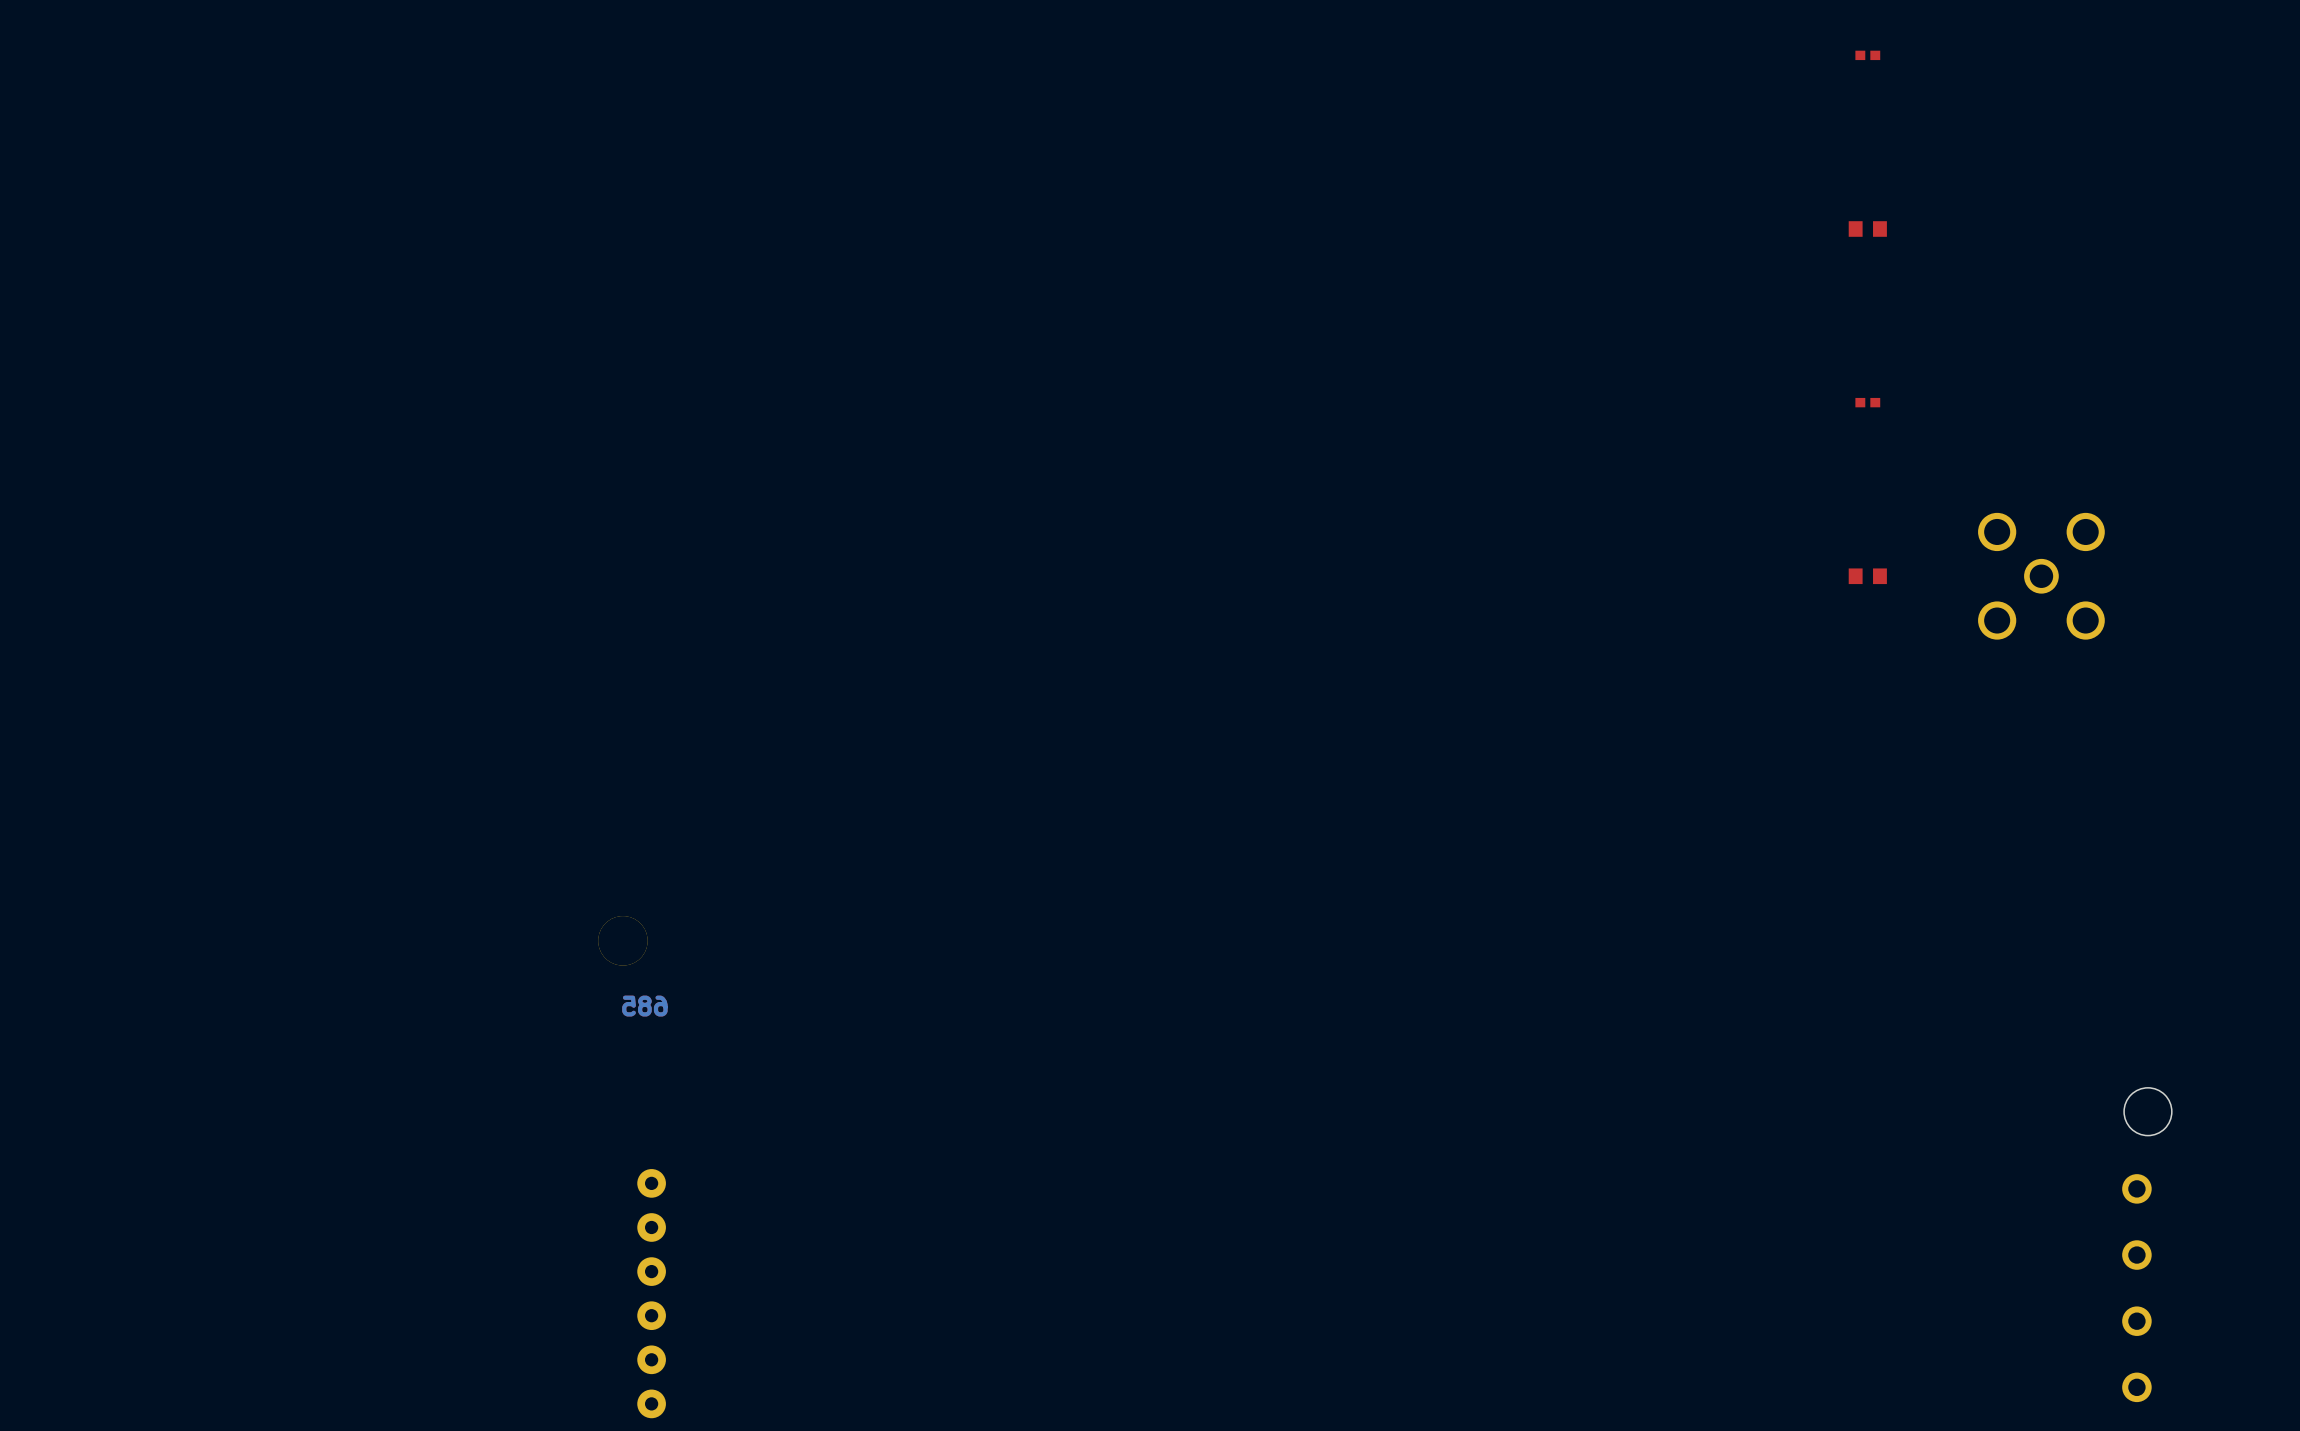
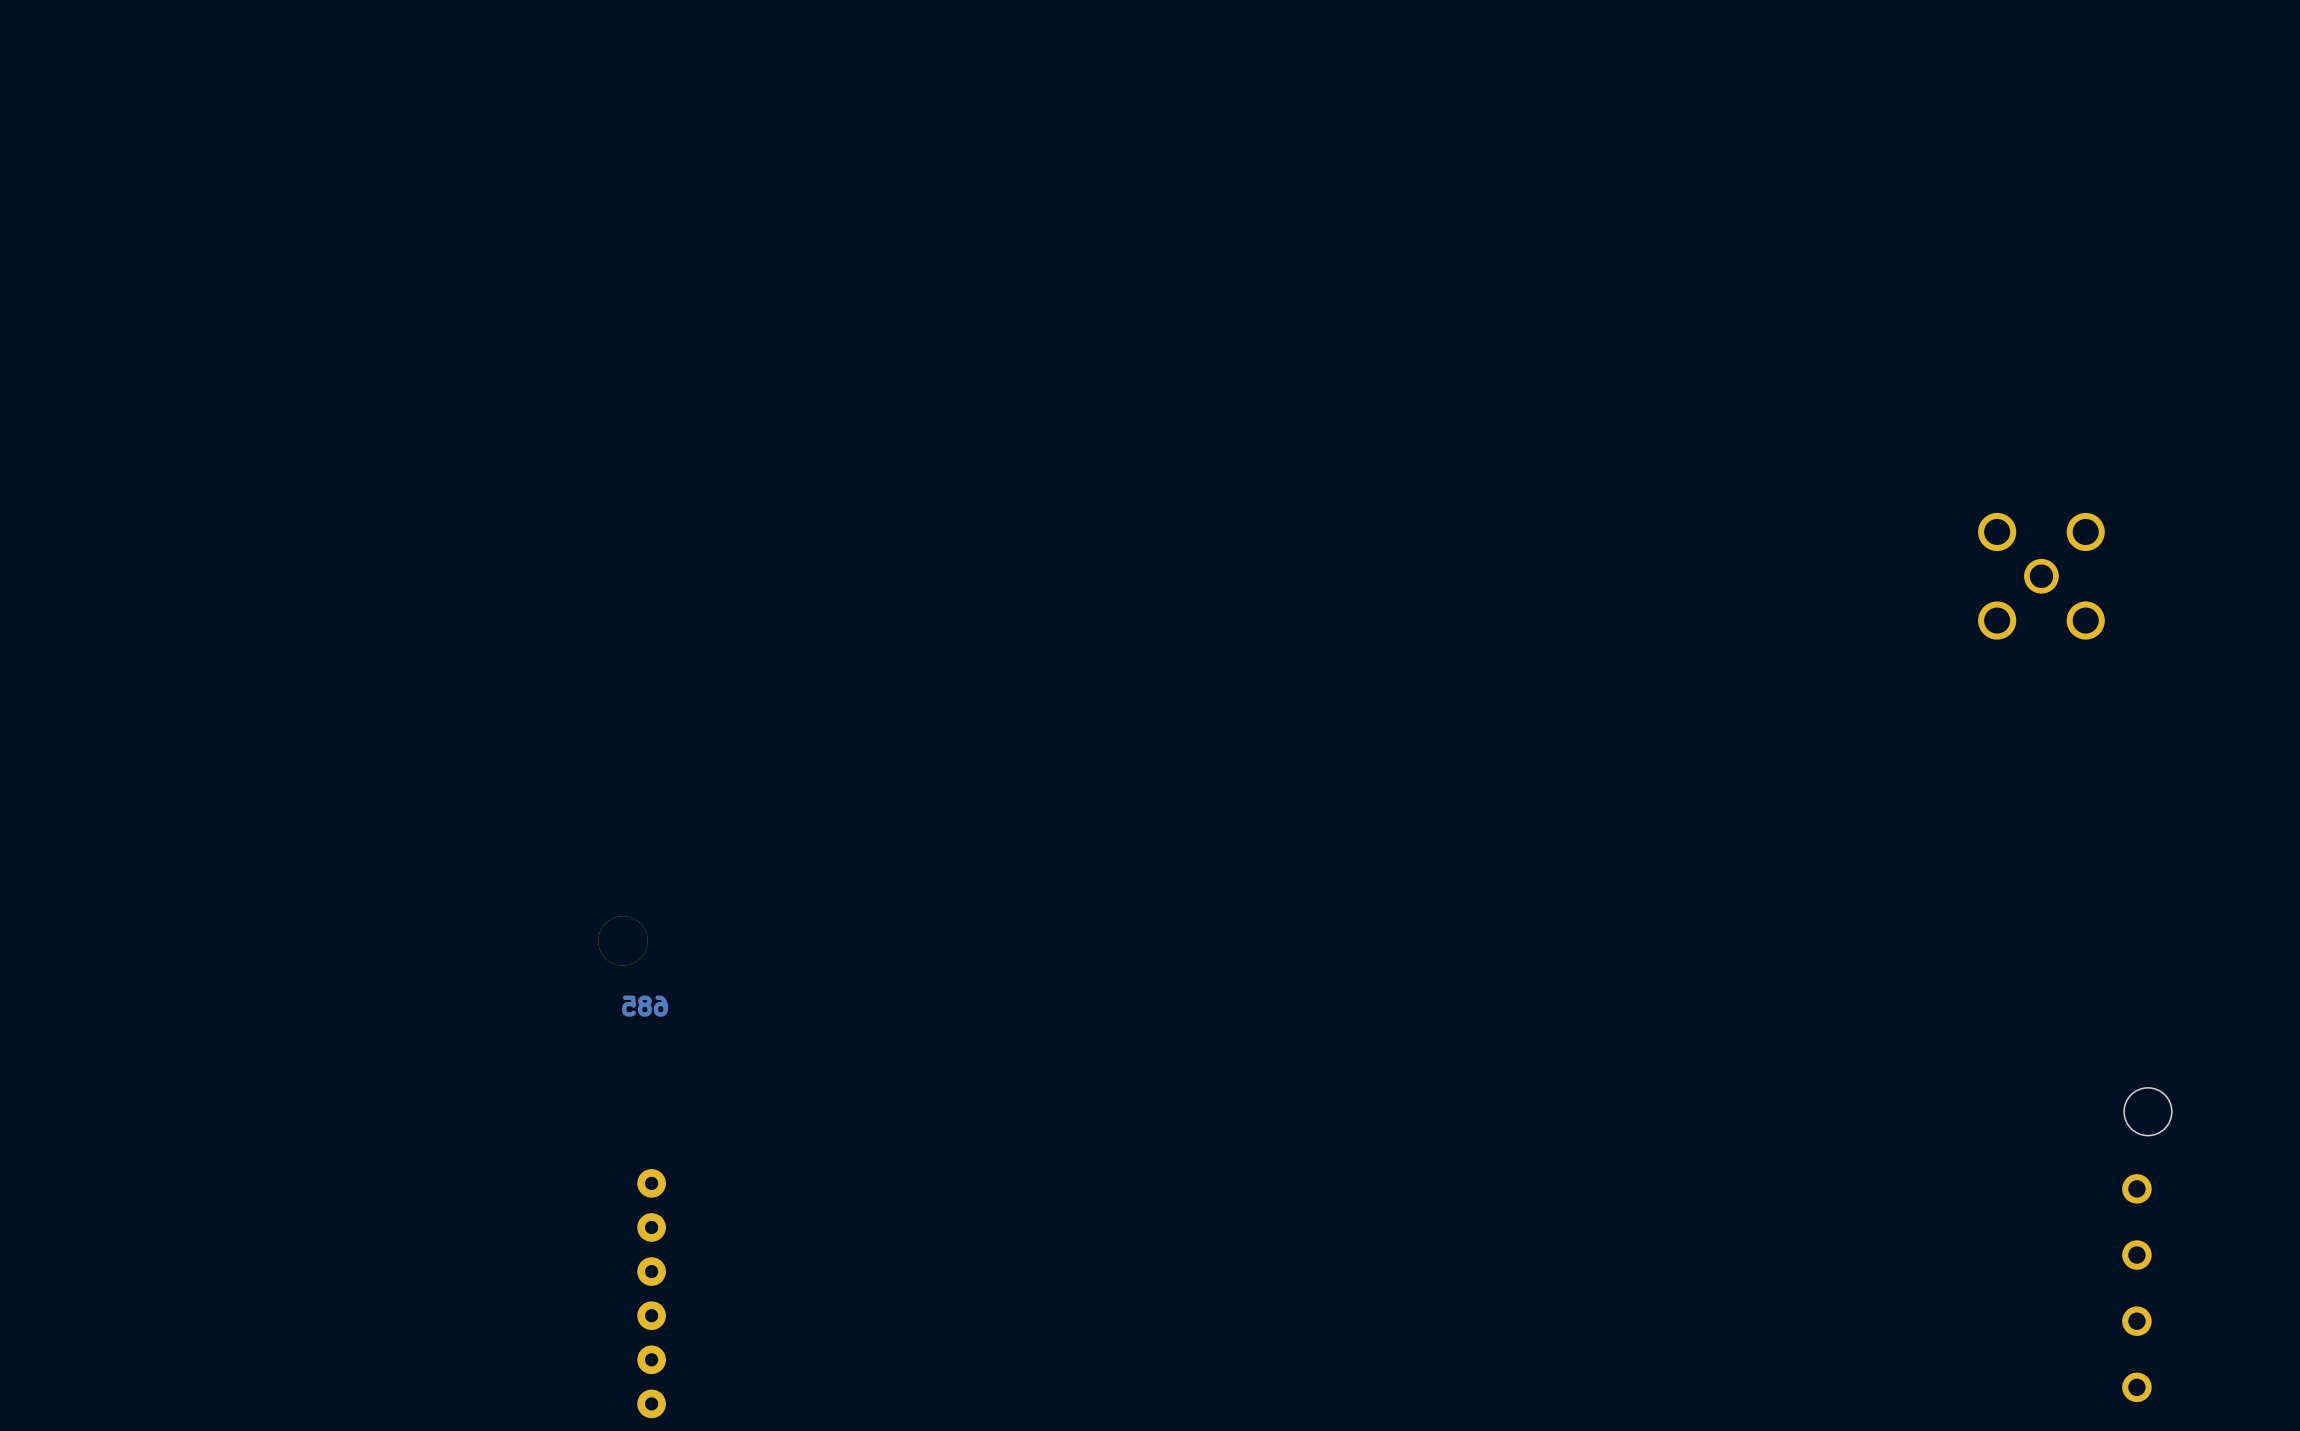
part: (1867, 55) -> none
part: (1867, 229) -> none
part: (1867, 402) -> none
part: (1867, 576) -> none

